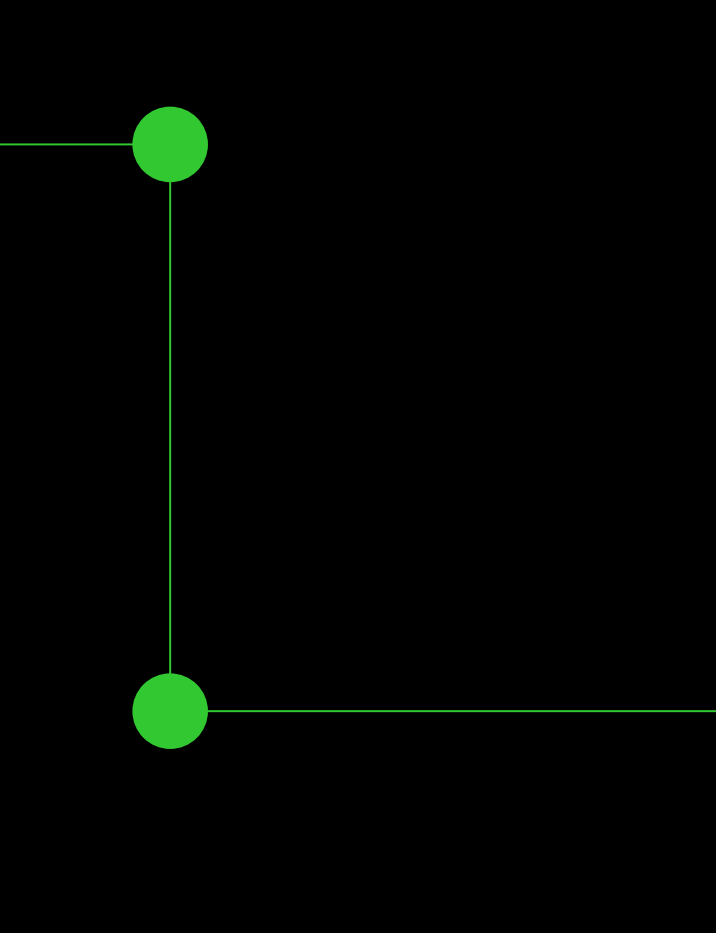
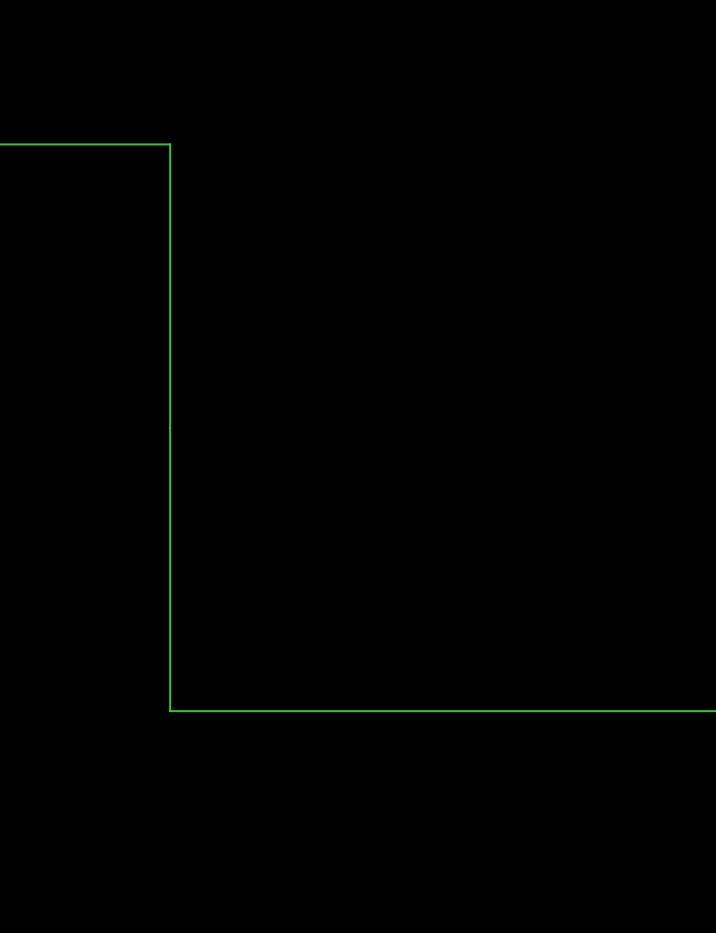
junction: (170, 144) -> none
junction: (170, 711) -> none

